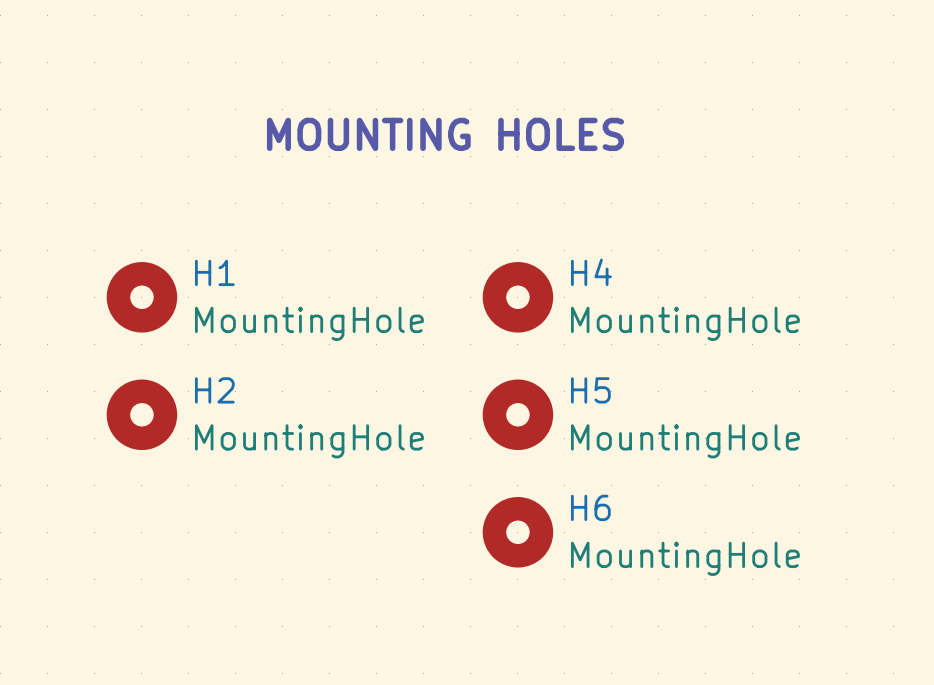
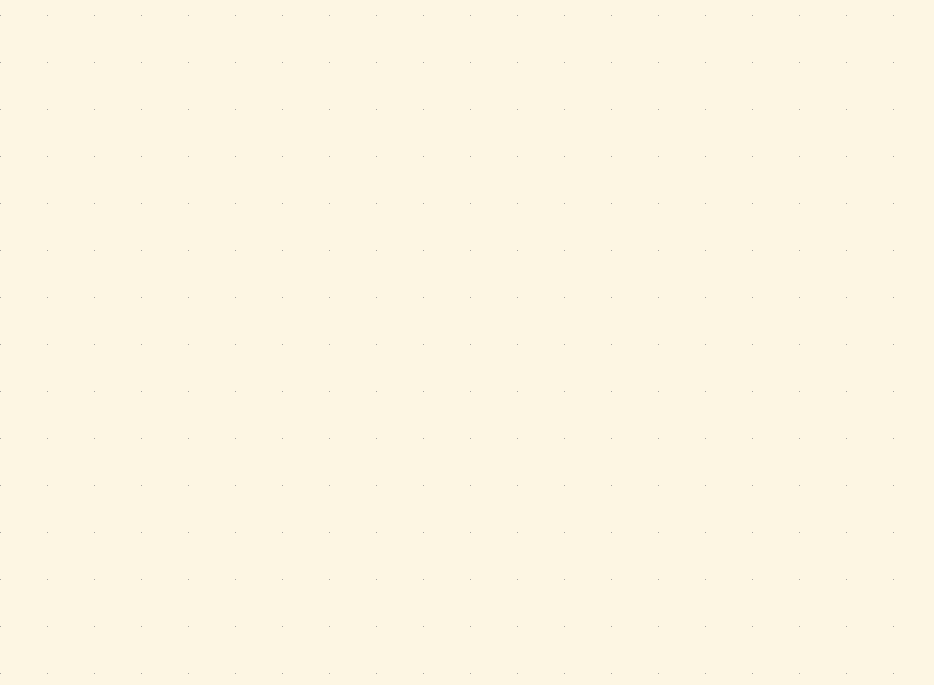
text: MOUNTING HOLES (445, 134) -> none
H1: MountingHole (141, 297) -> none
H4: MountingHole (517, 297) -> none
H2: MountingHole (141, 414) -> none
H5: MountingHole (517, 414) -> none
H6: MountingHole (517, 532) -> none

